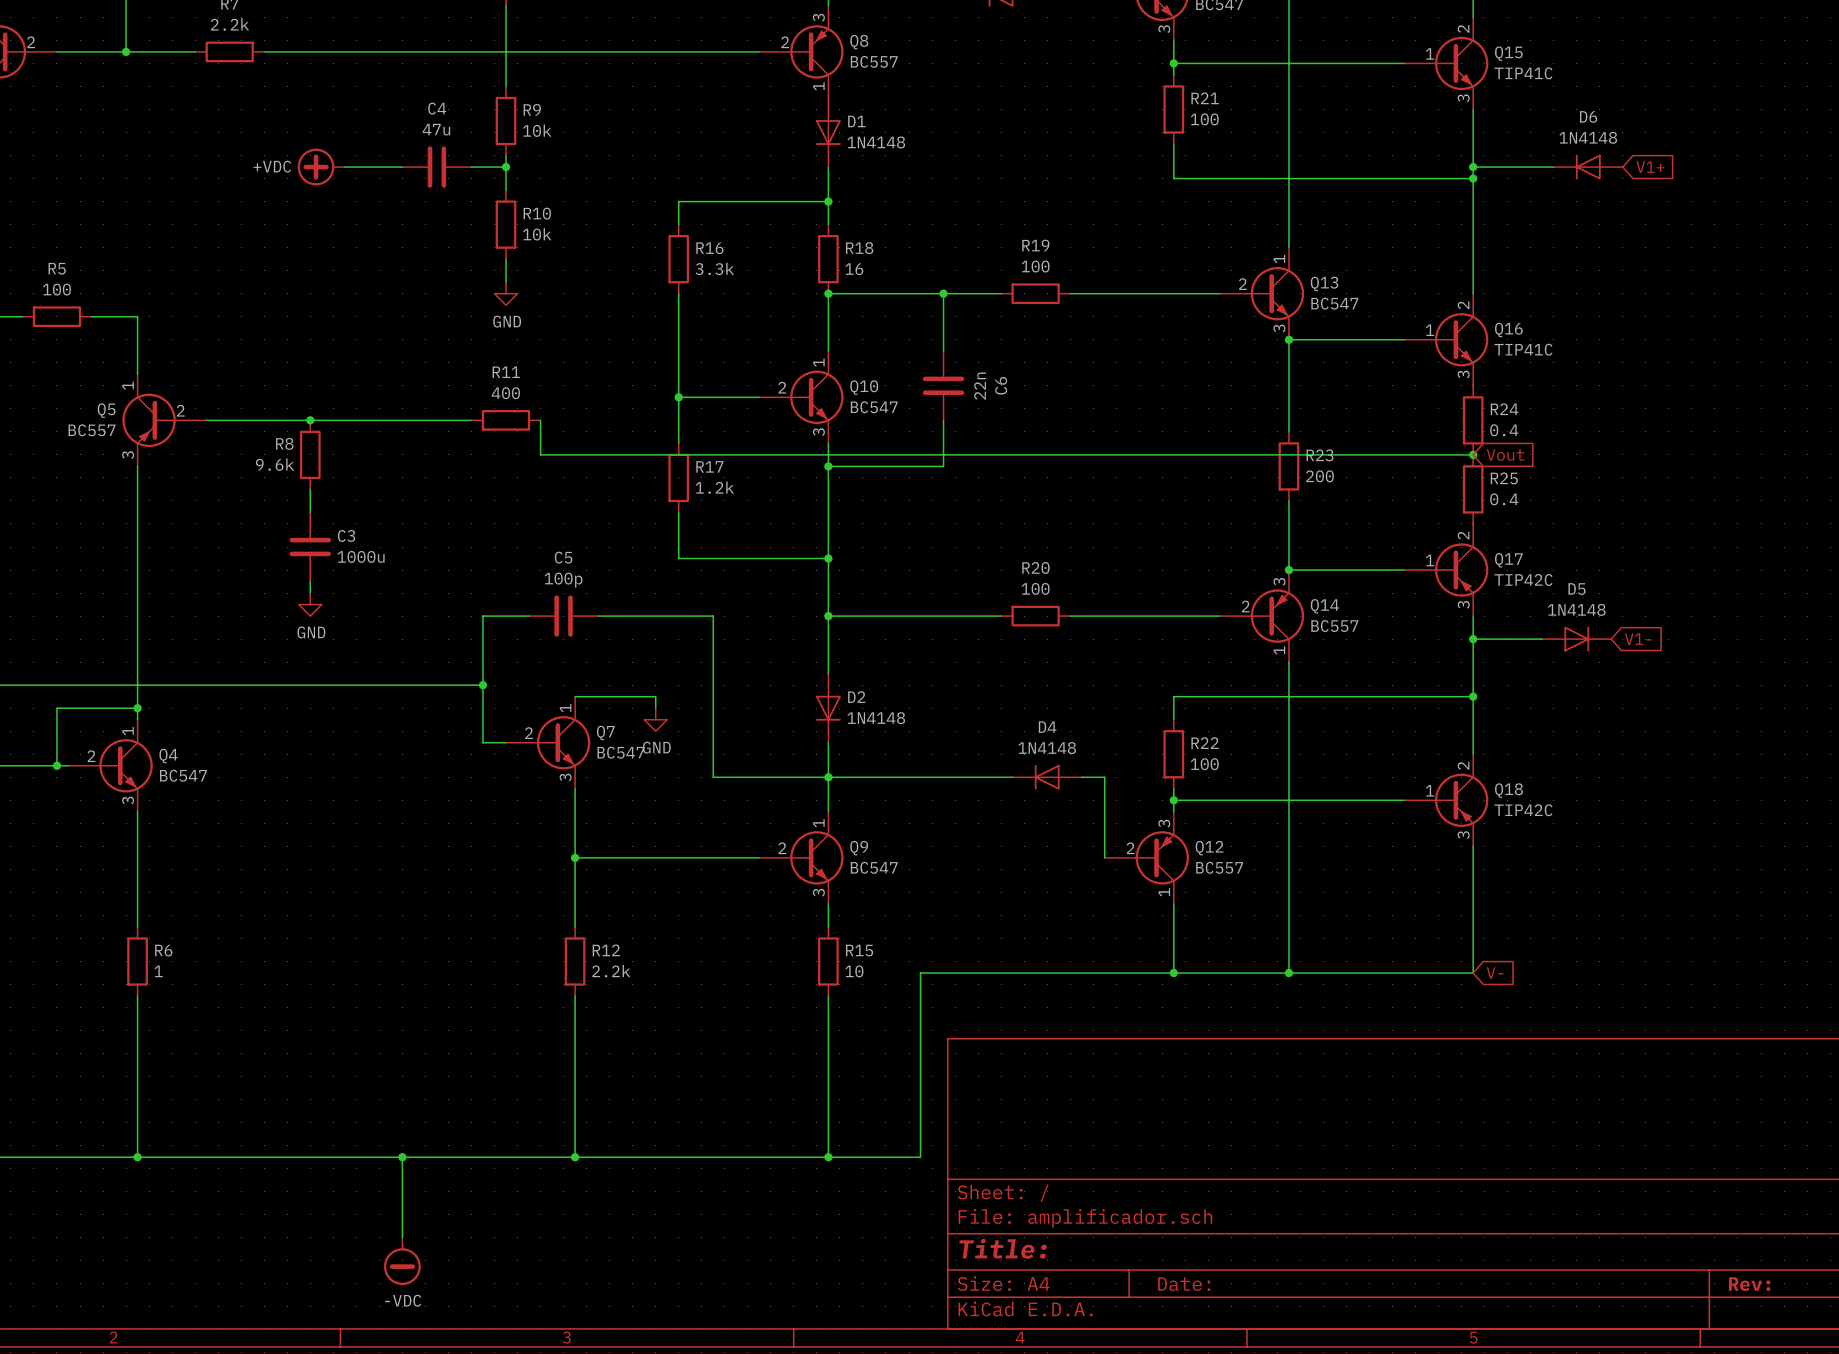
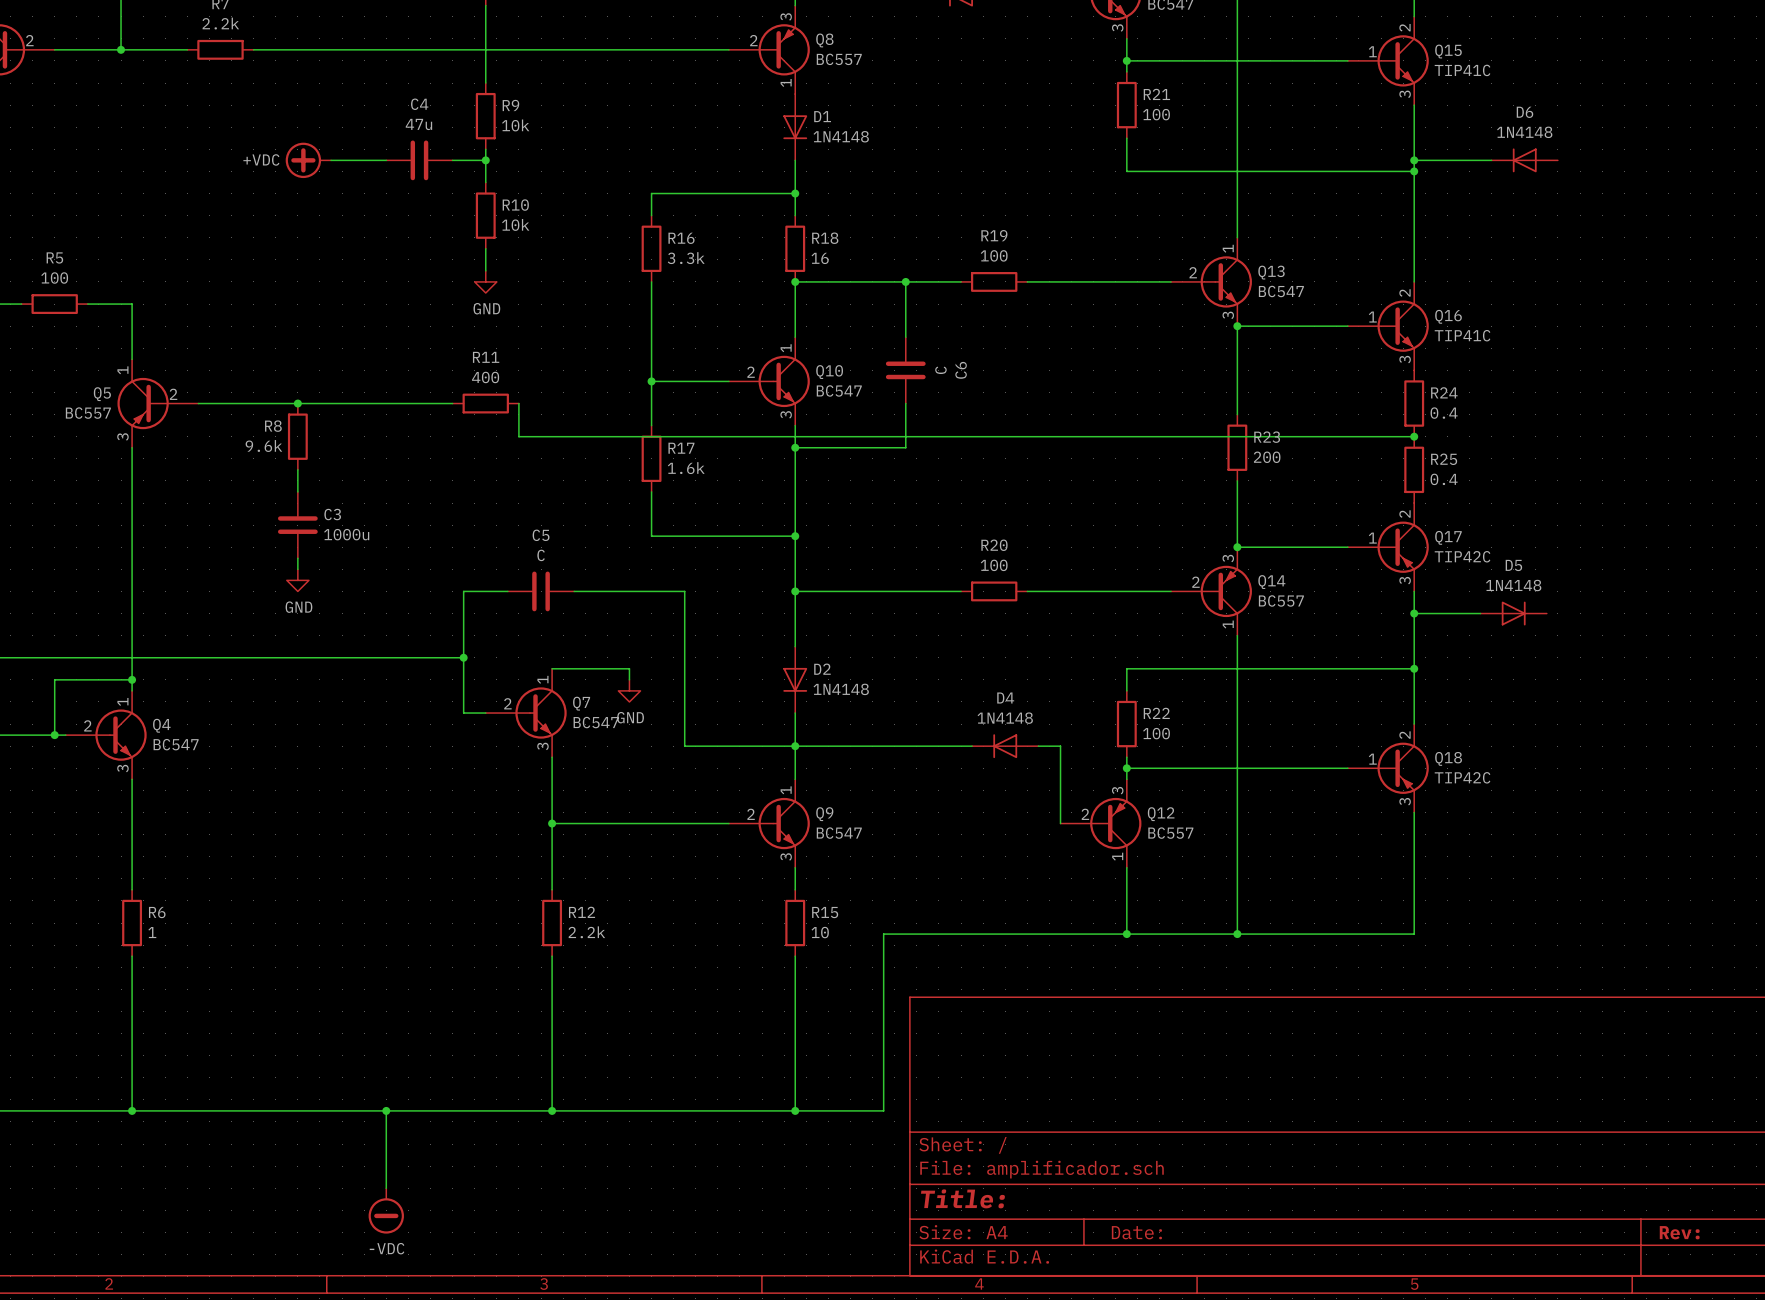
global label: V1+ (1650, 167) -> none
C6 value: 22n (980, 386) -> C (940, 370)
global label: Vout (1505, 455) -> none
R17 value: 1.2k (714, 487) -> 1.6k (686, 468)
C5 value: 100p (563, 580) -> C (541, 555)
global label: V1- (1638, 639) -> none
global label: V- (1495, 973) -> none

